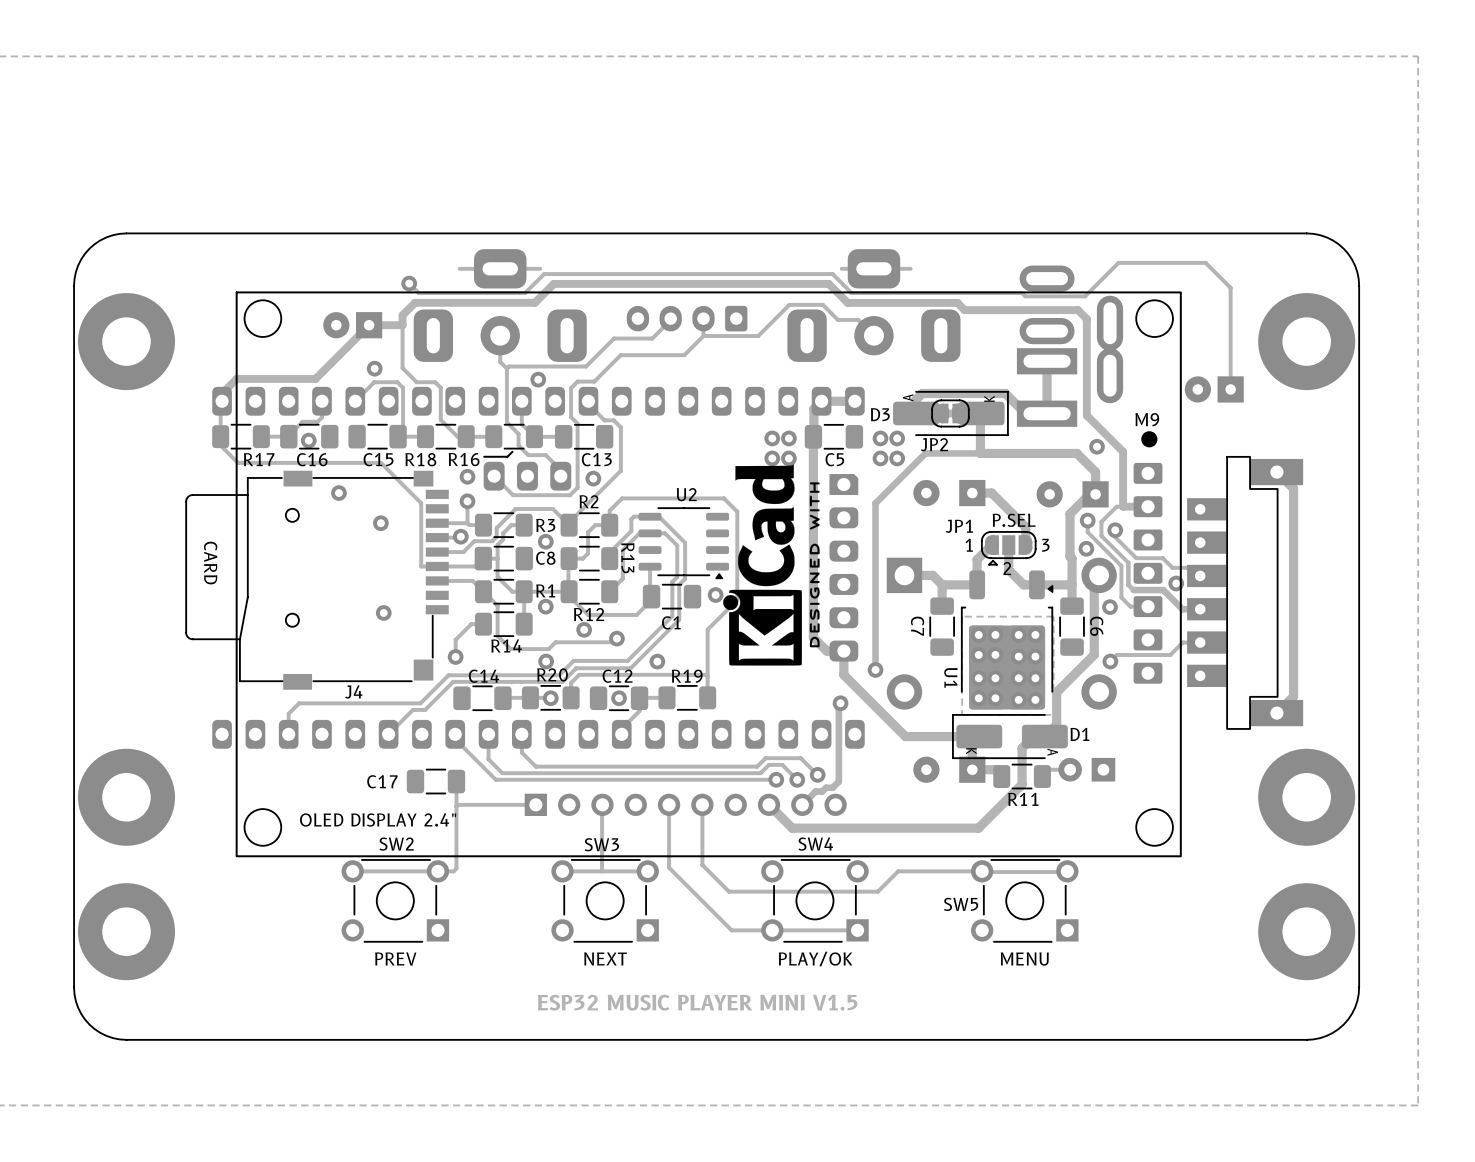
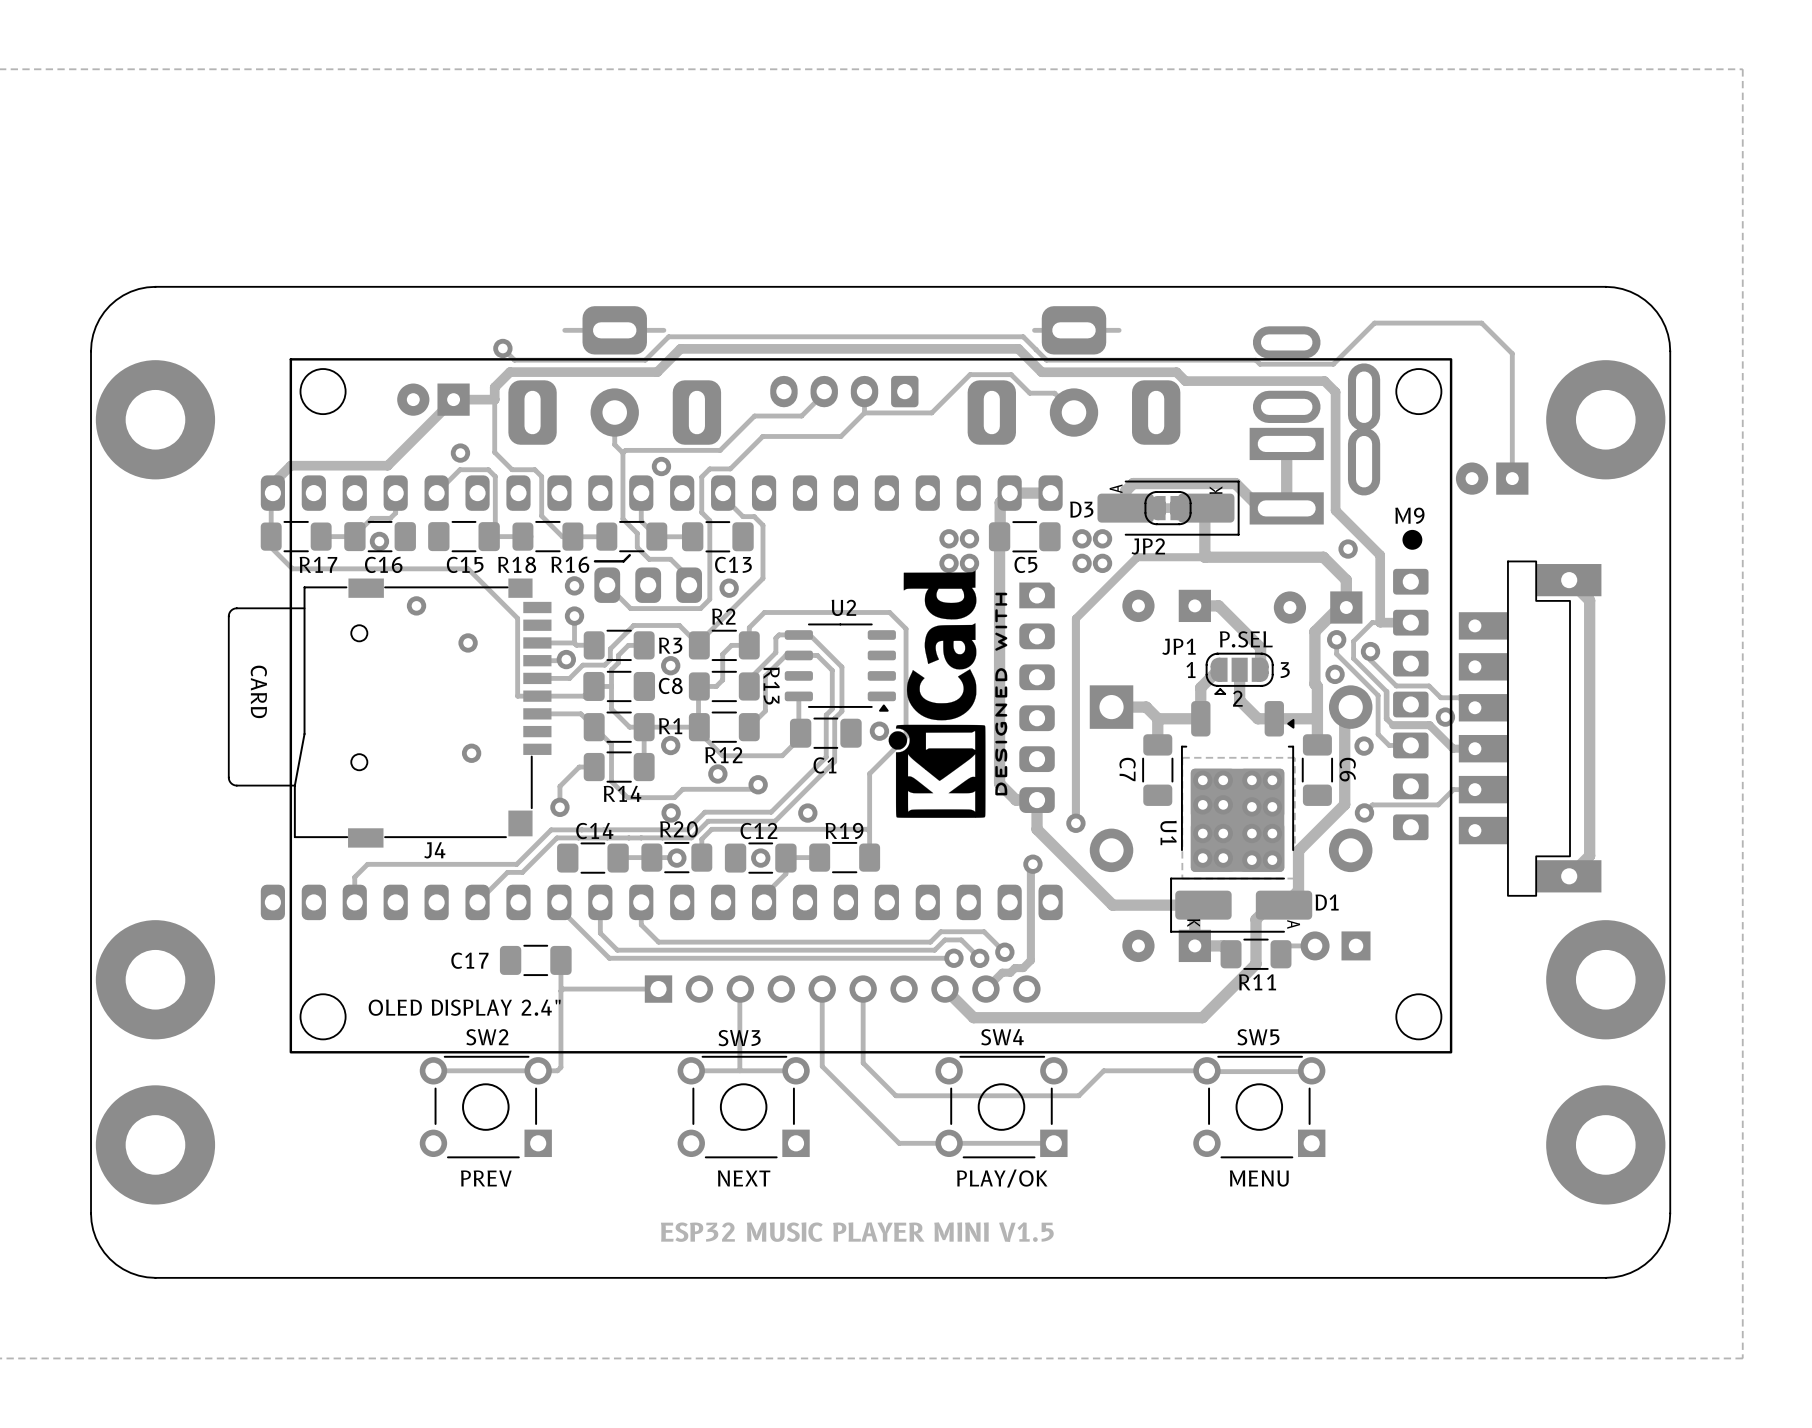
SW5 name position: SW5 (961, 904) -> SW5 (1258, 1037)

